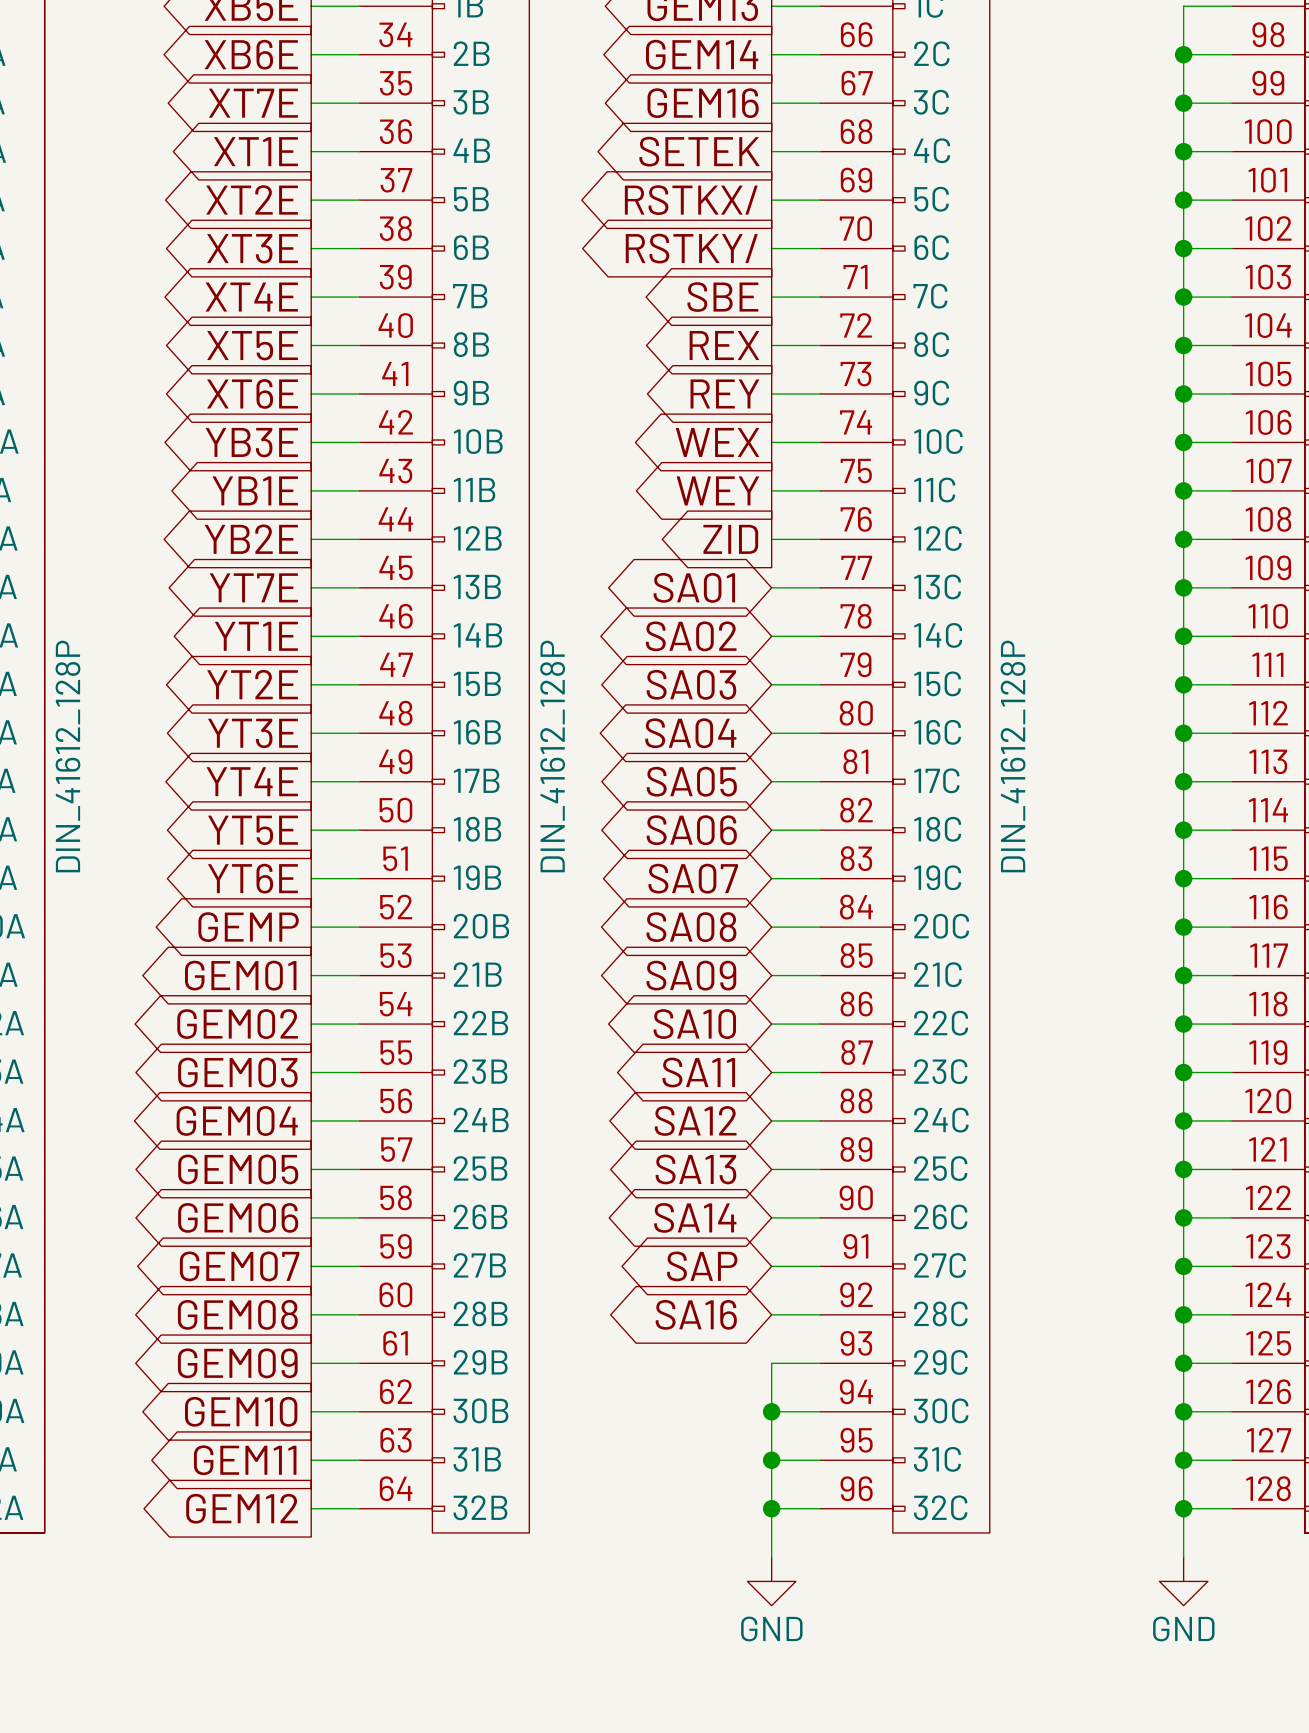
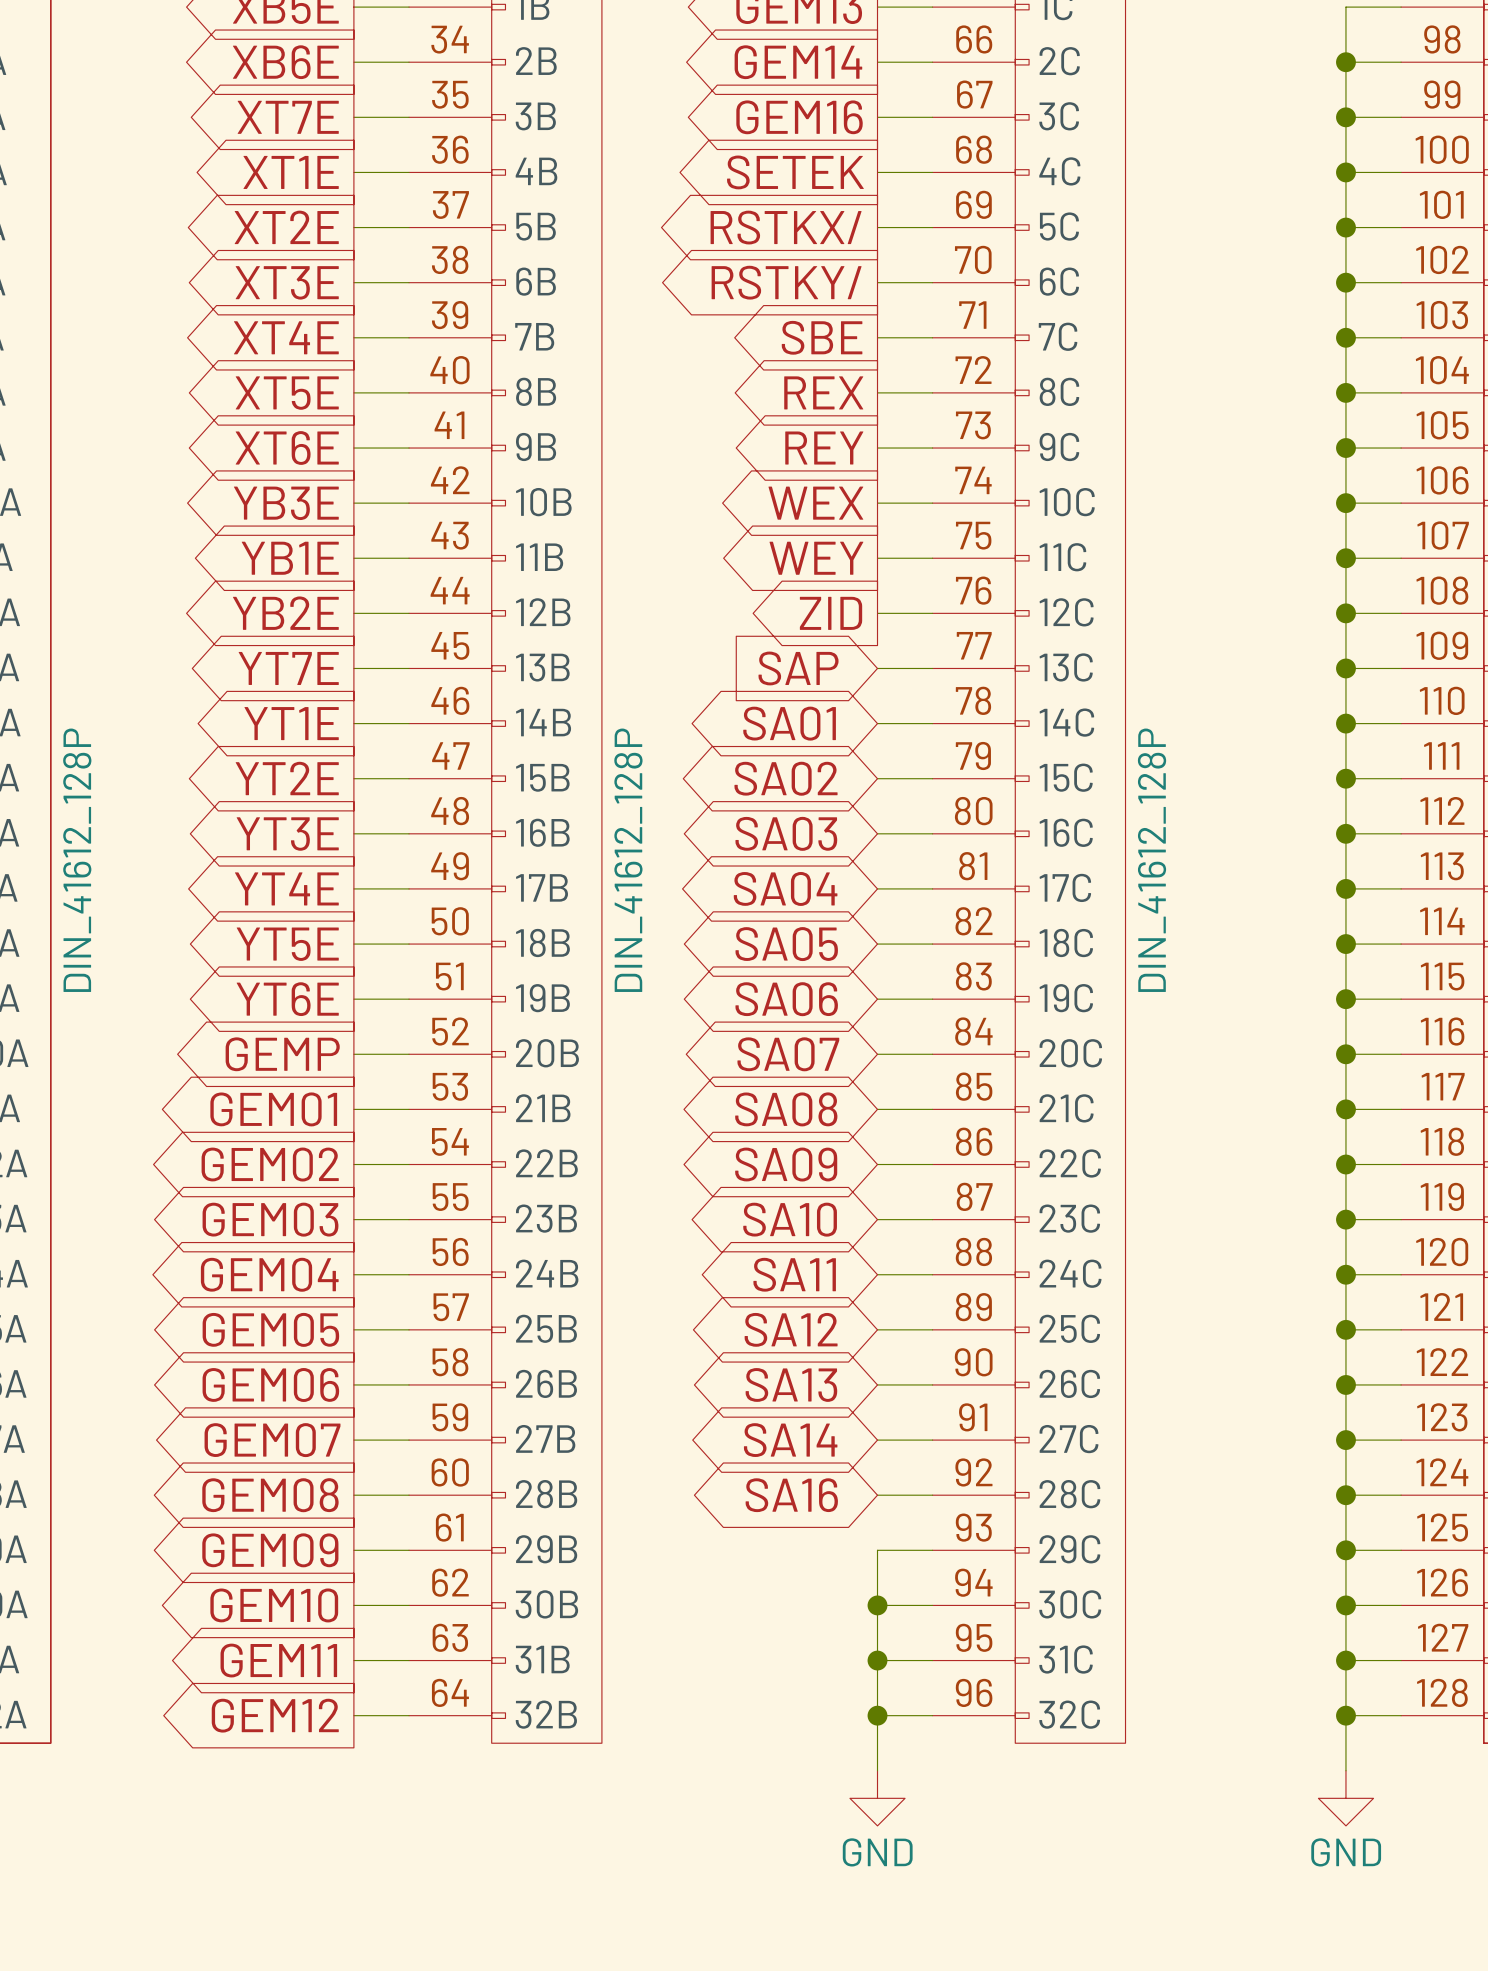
global label shape: bidirectional (694, 587) -> input (798, 668)
global label: SA01 (694, 587) -> SAP (798, 668)
global label: SA02 (691, 636) -> SA01 (789, 723)
global label: SA03 (691, 684) -> SA02 (786, 778)
global label: SA04 (690, 733) -> SA03 (786, 833)
global label: SA05 (691, 781) -> SA04 (785, 888)
global label: SA06 (691, 830) -> SA05 (786, 944)
global label: SA07 (693, 878) -> SA06 (786, 999)
global label: SA08 (691, 927) -> SA07 (788, 1054)
global label: SA09 (691, 975) -> SA08 (786, 1109)
global label: SA10 (694, 1024) -> SA09 (786, 1164)
global label: SA11 (698, 1072) -> SA10 (790, 1219)
global label: SA12 (695, 1120) -> SA11 (794, 1274)
global label: SA13 (695, 1169) -> SA12 (791, 1329)
global label: SA14 (695, 1217) -> SA13 (791, 1384)
global label: SAP (702, 1266) -> SA14 (790, 1440)

